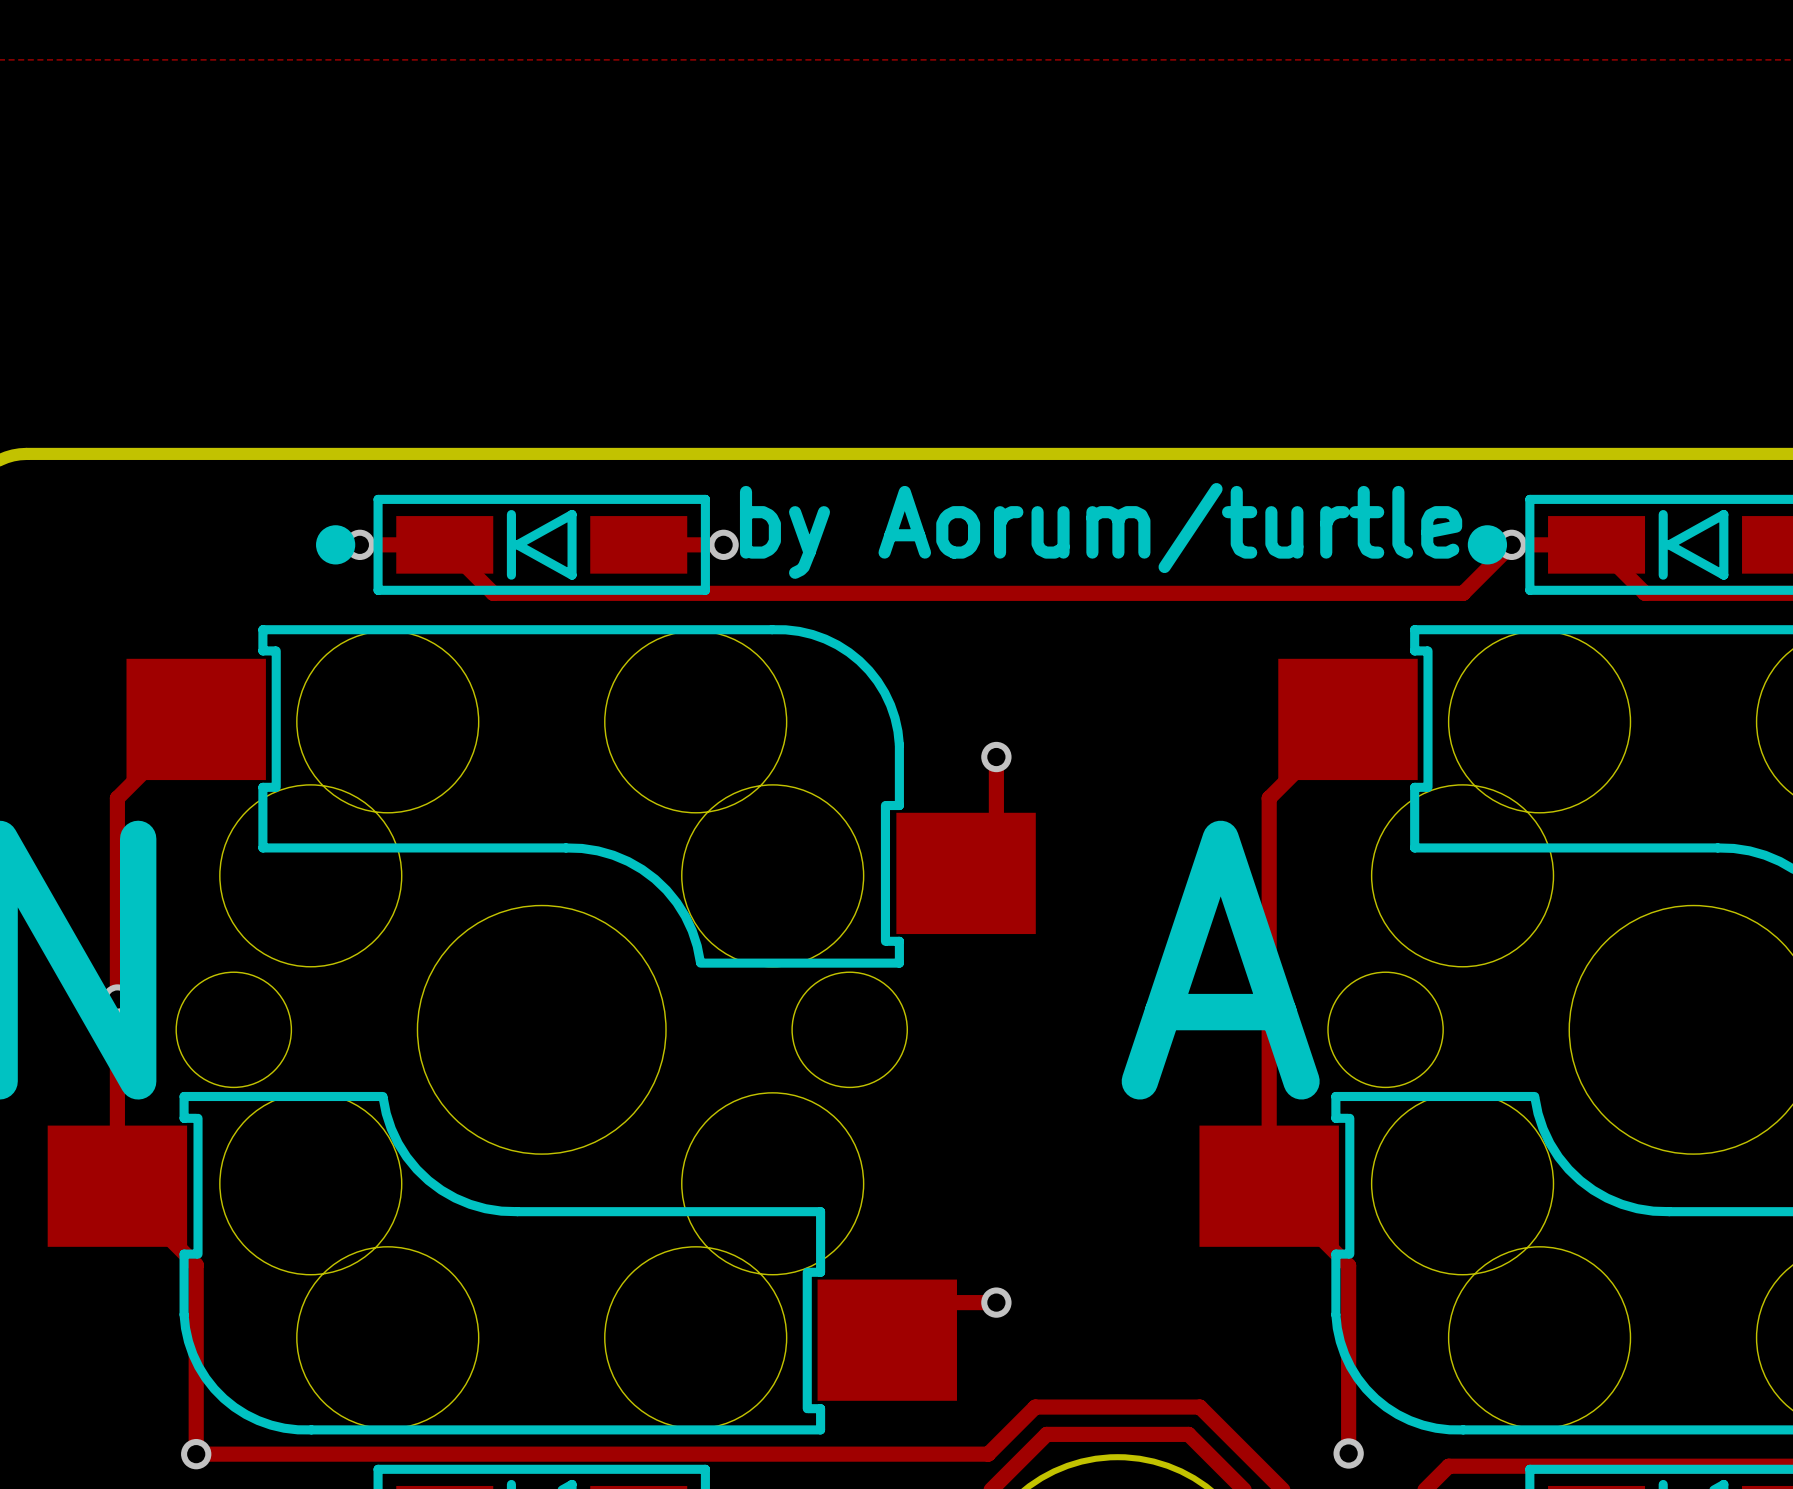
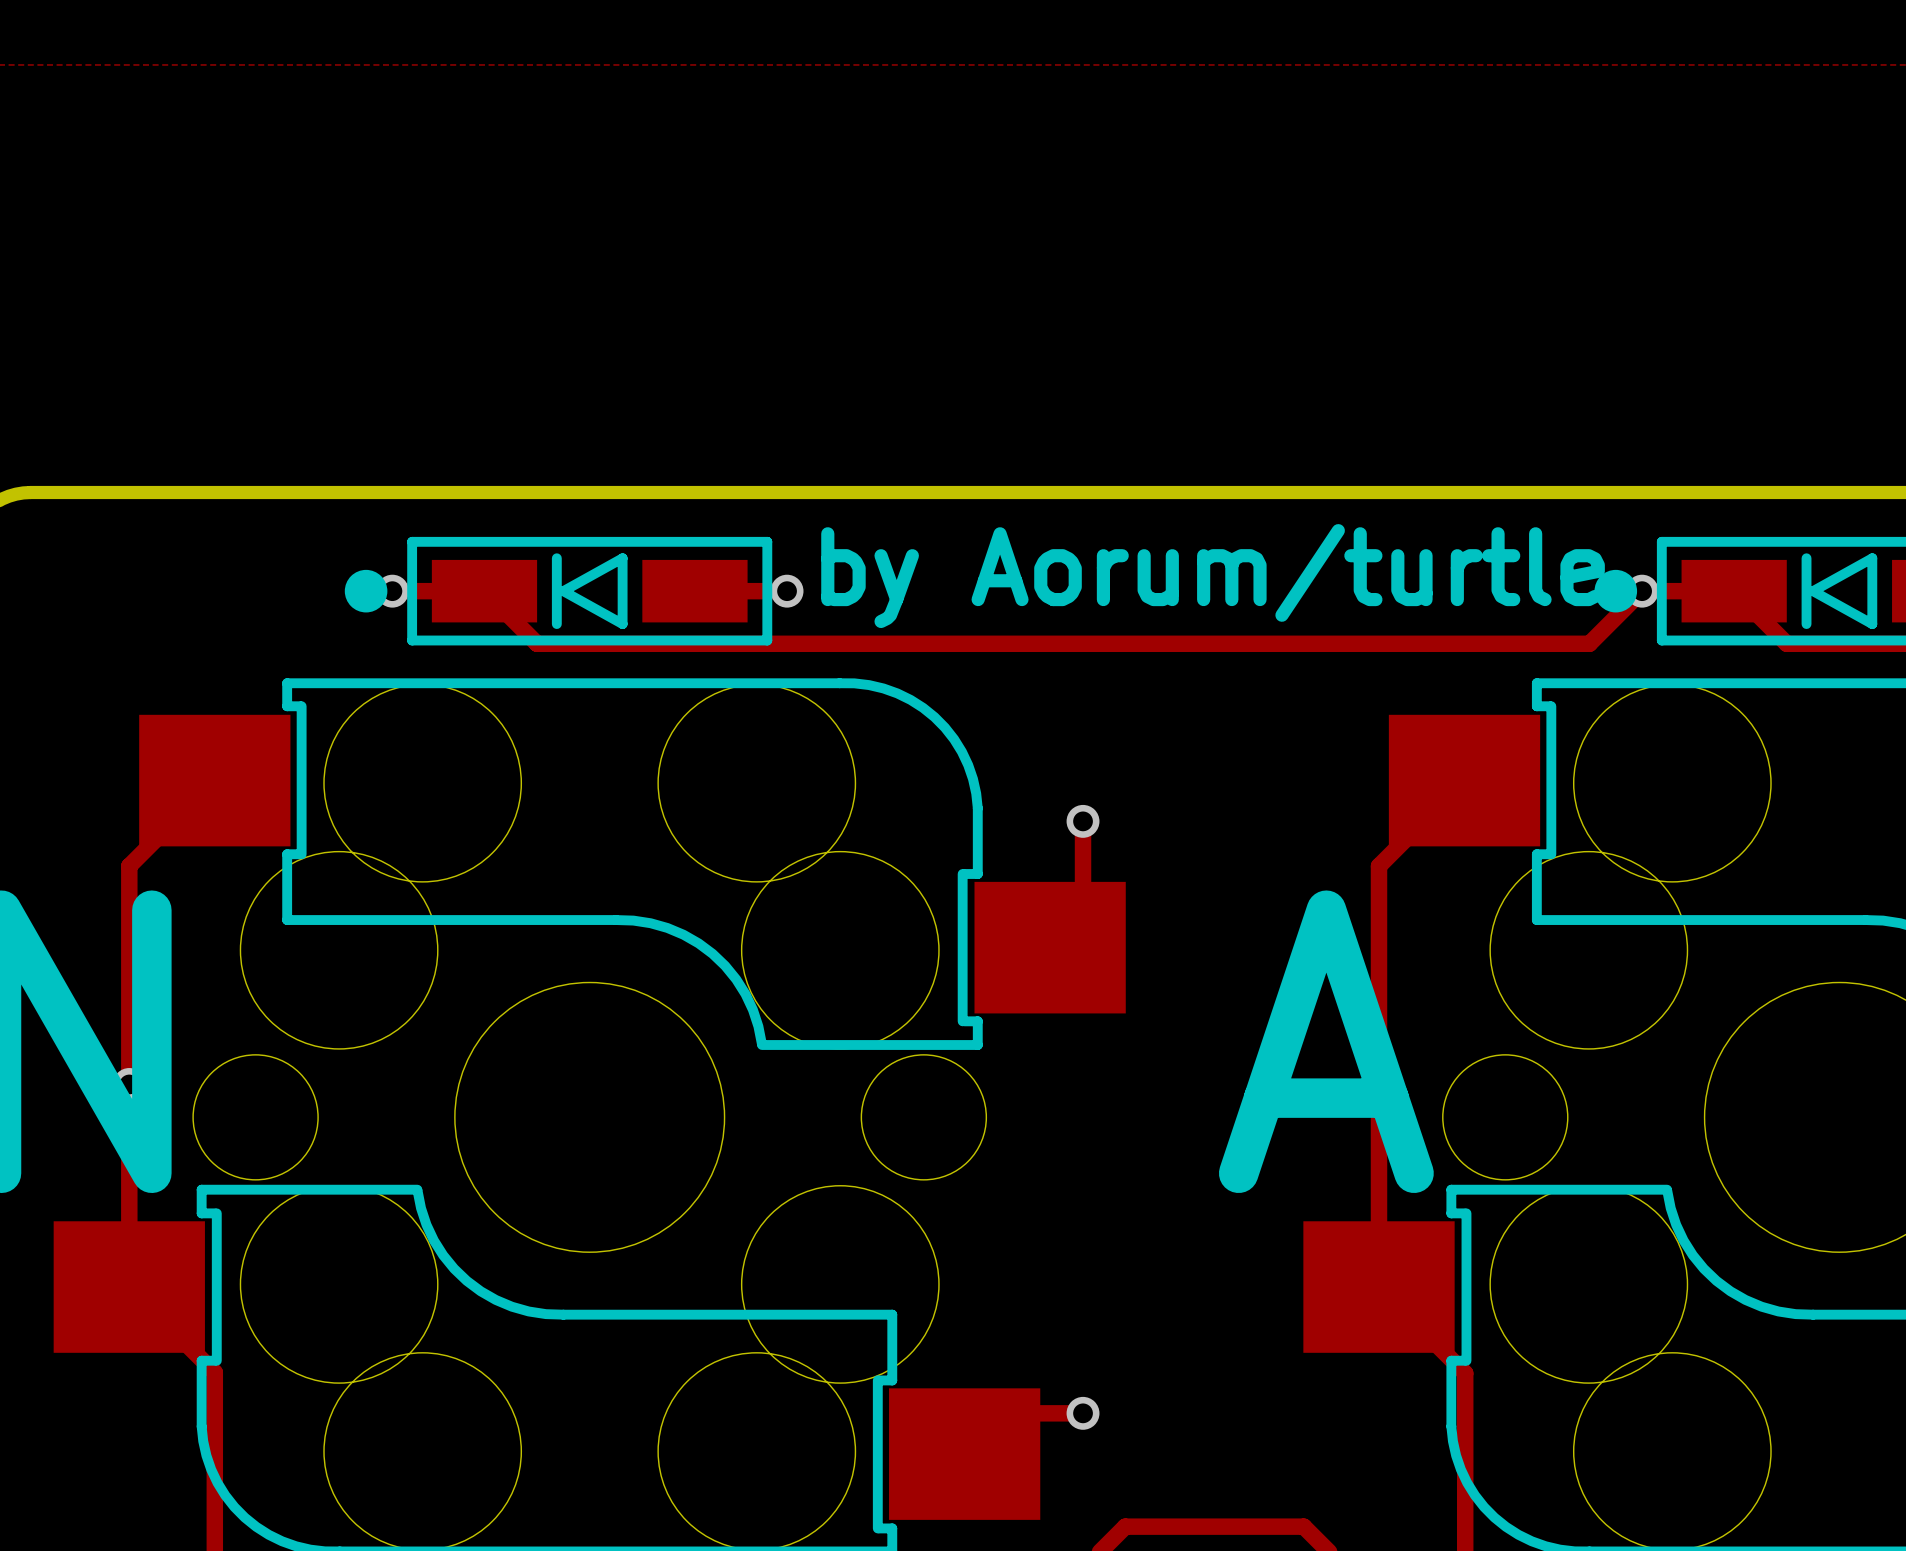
text position: by Aorum/turtle (1101, 530) -> by Aorum/turtle (1213, 576)

